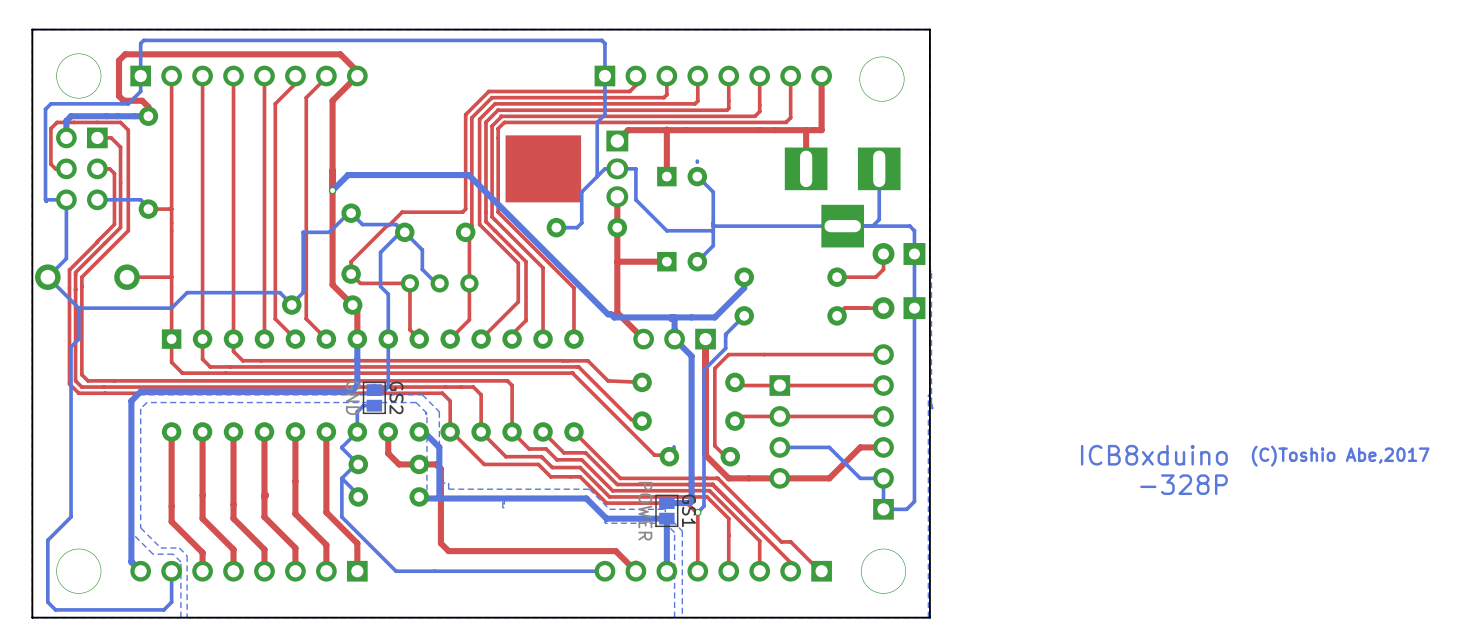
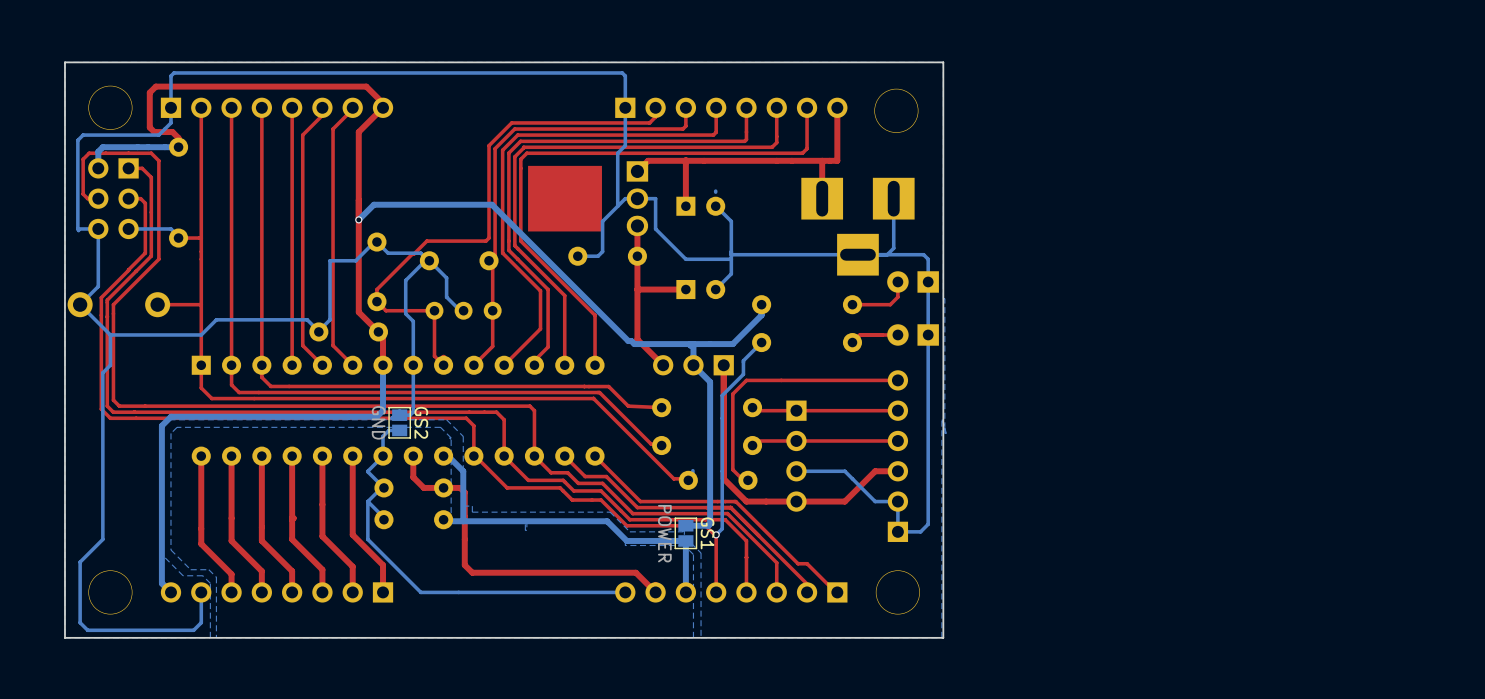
text: ICB8xduino (1154, 455) -> none
text: (C)Toshio Abe,2017 (1340, 456) -> none
text: -328P (1183, 484) -> none

